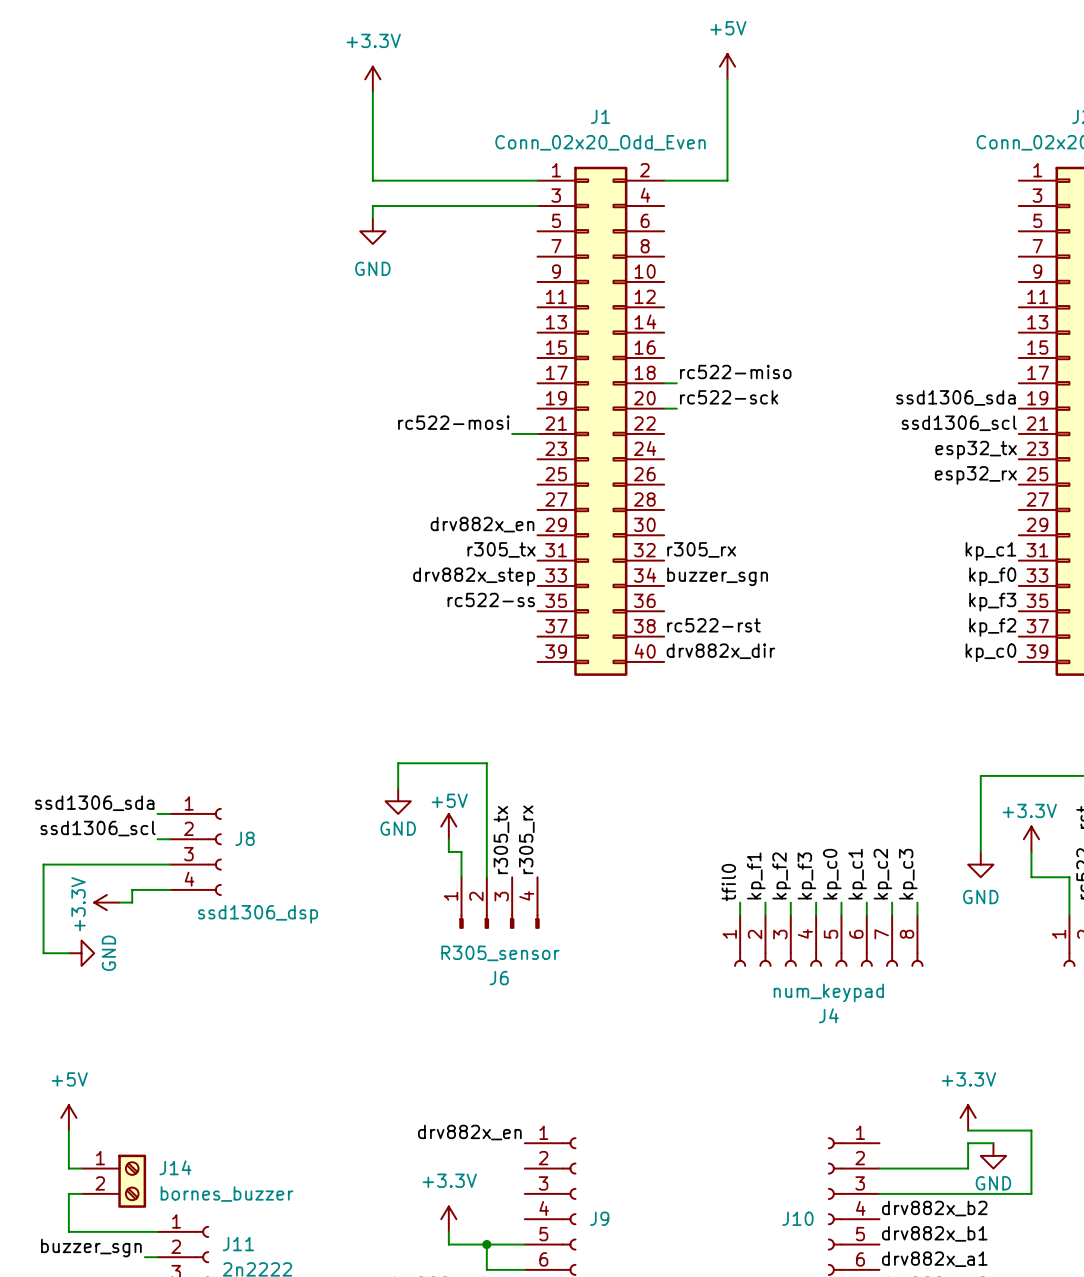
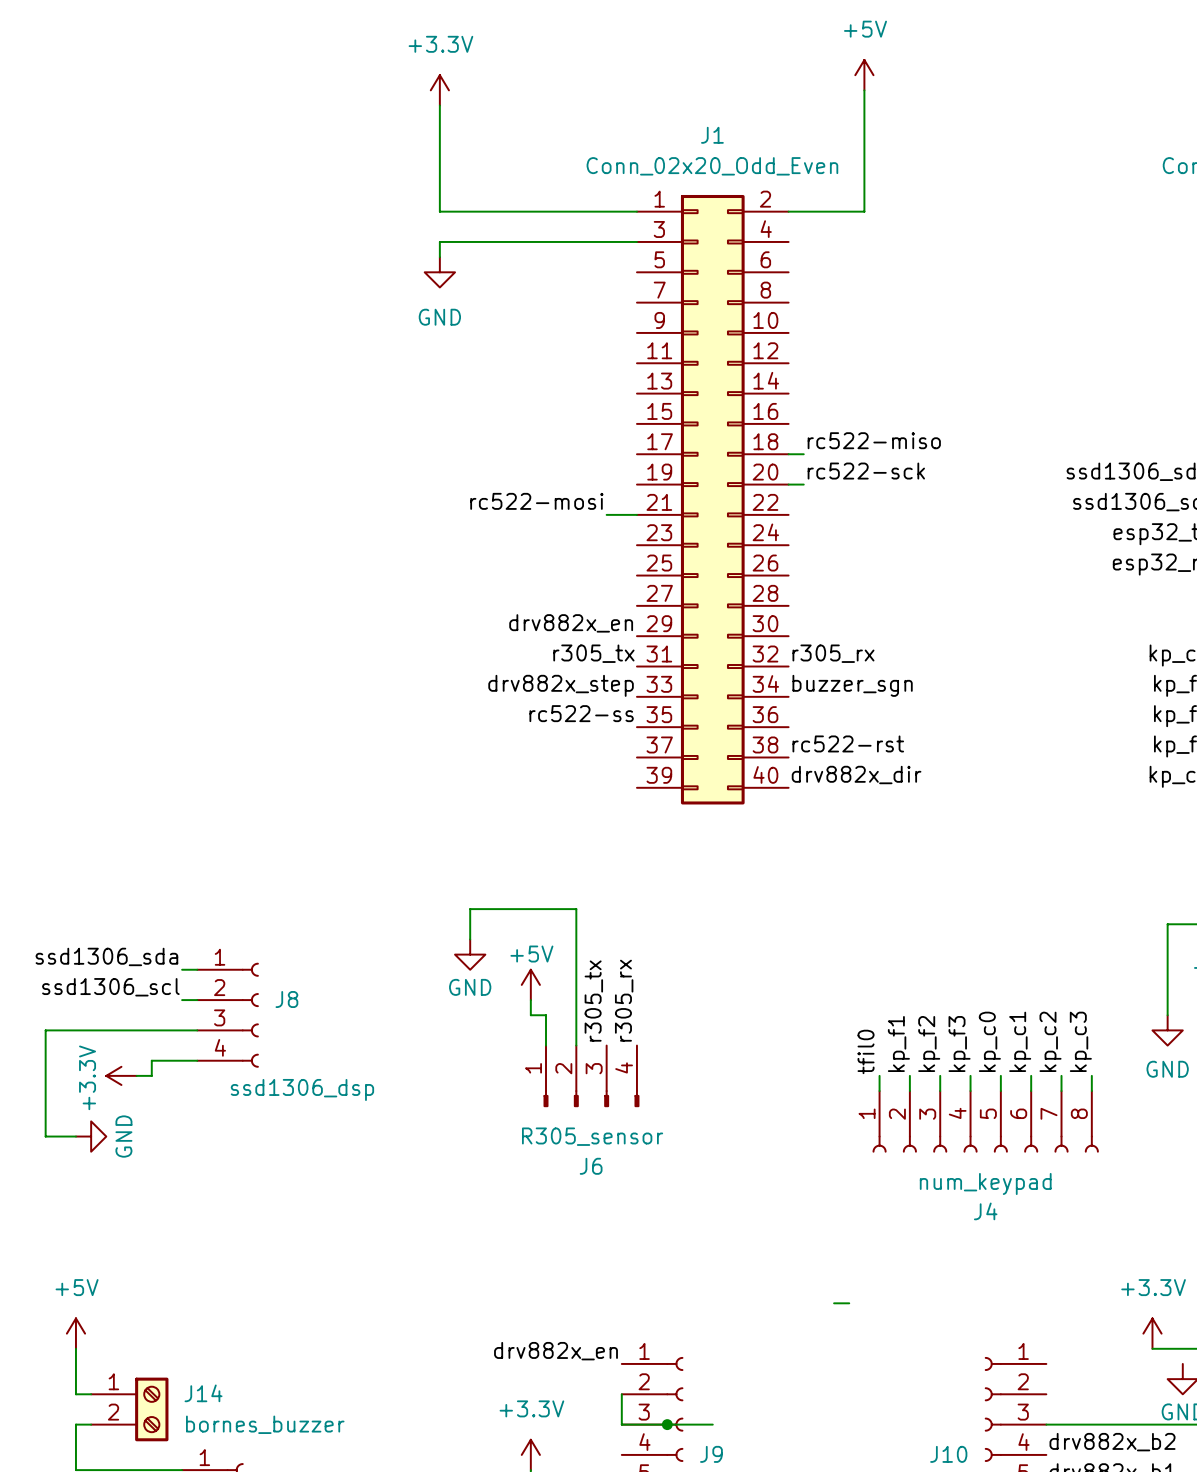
wire: none -> (834, 1303) (849, 1303)
wire: (993, 1143) (968, 1143) (968, 1168) (879, 1168) -> none
wire: none -> (621, 1394) (621, 1424) (712, 1424)
junction: none -> (667, 1424)

